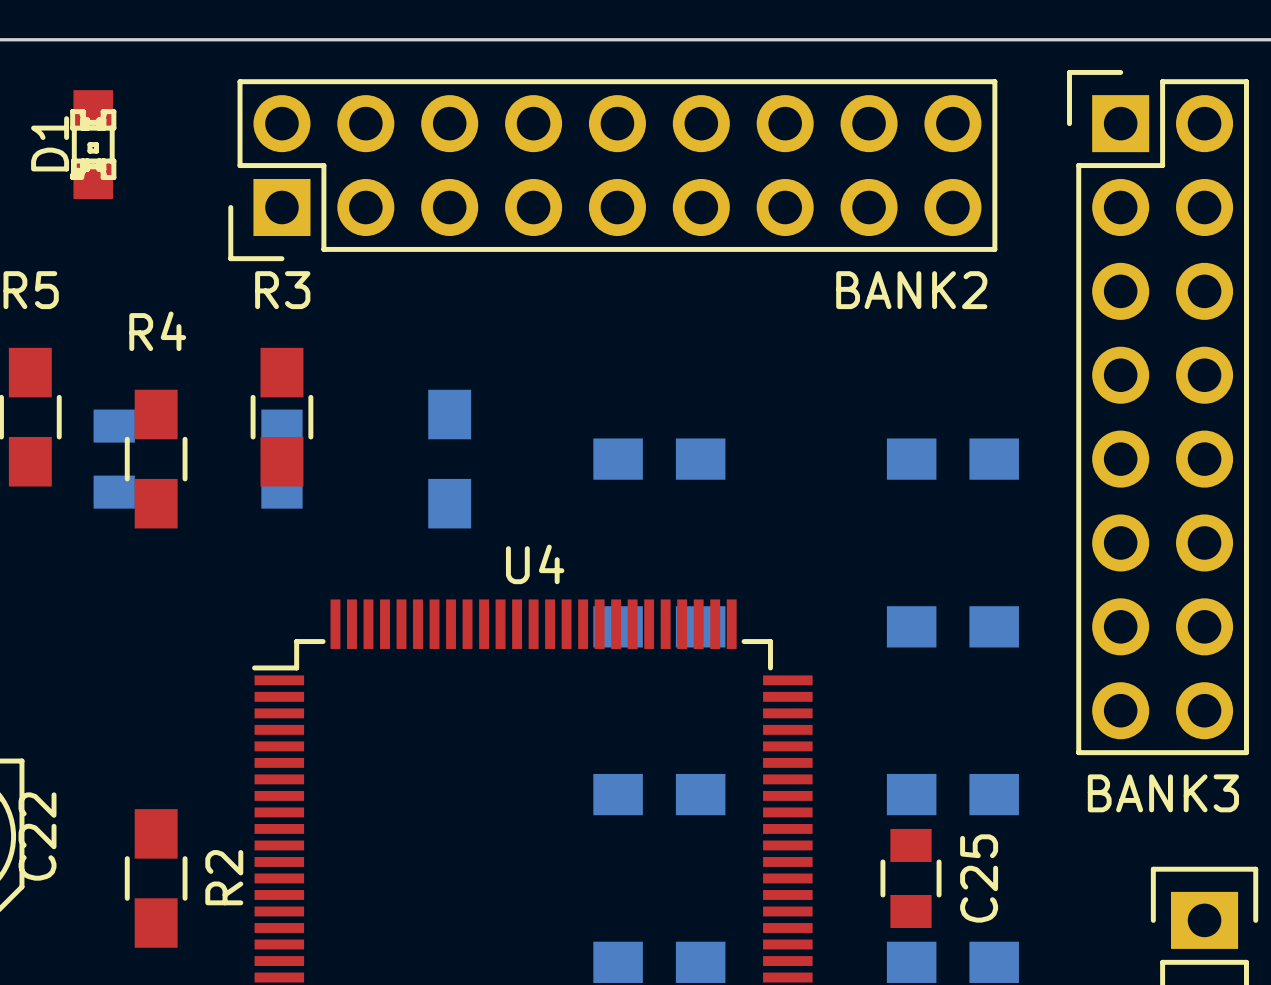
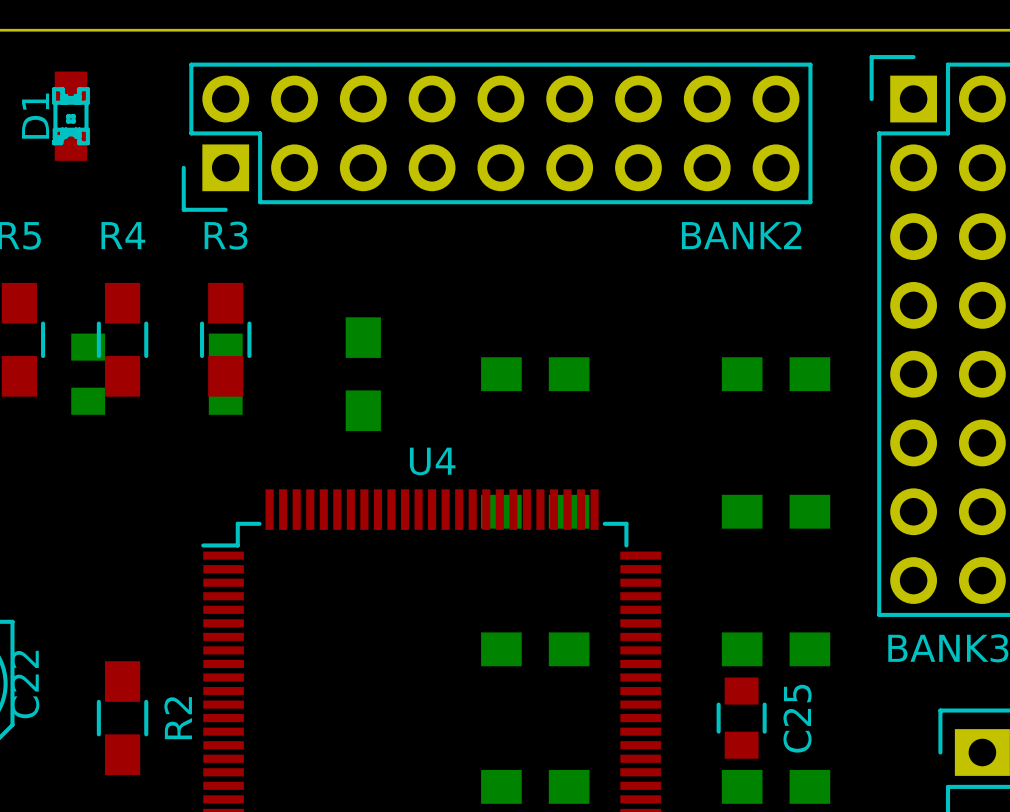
R4 position: (156, 459) -> (122, 339)

